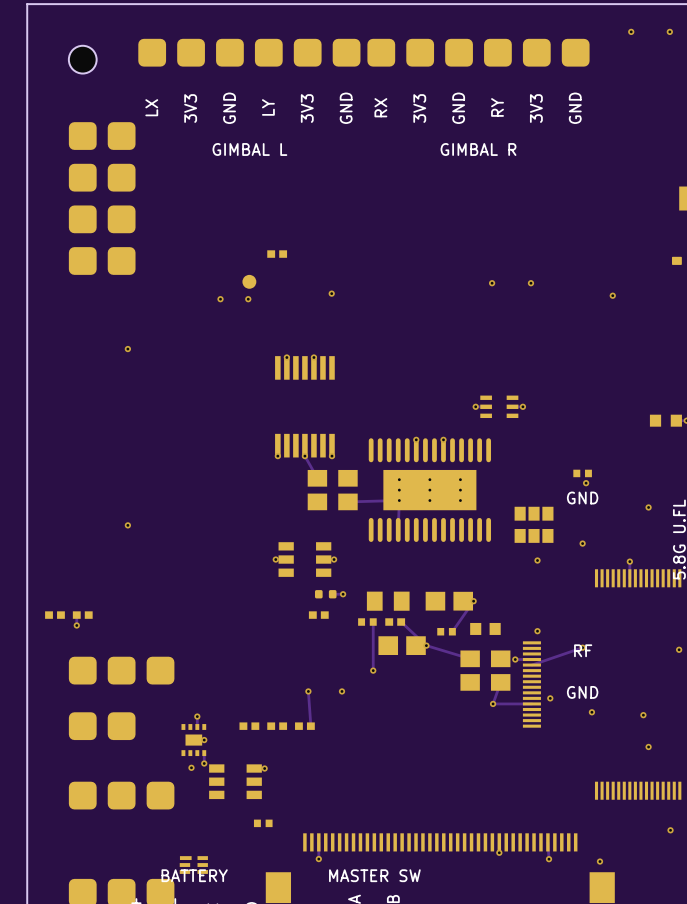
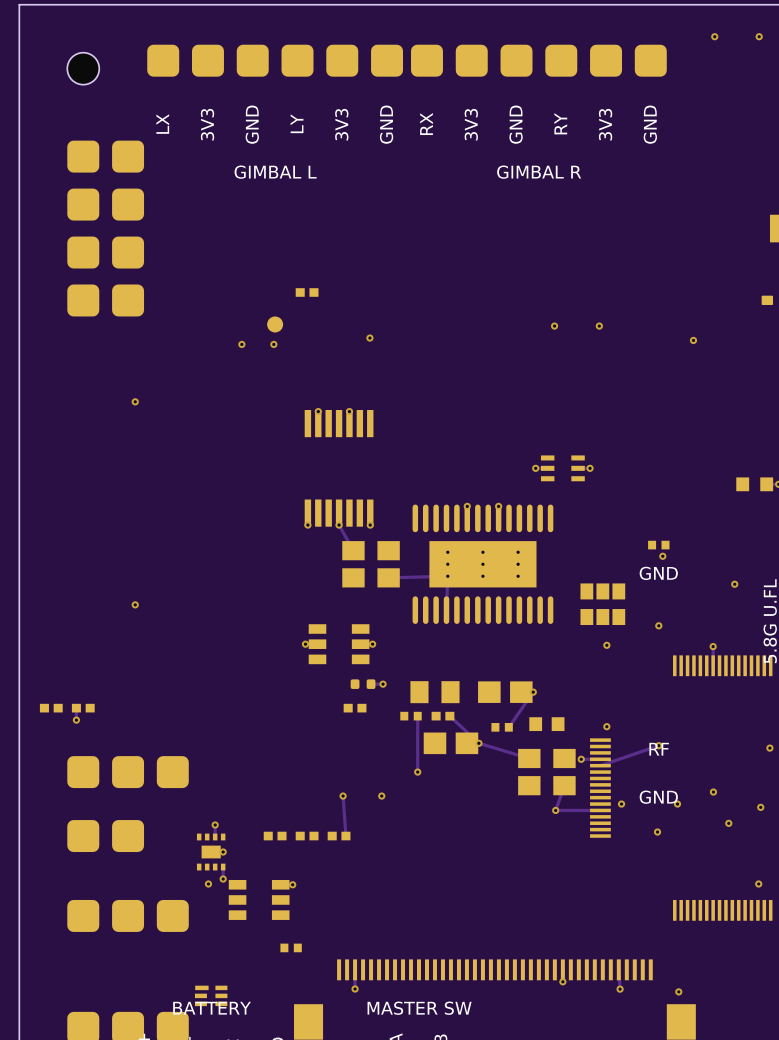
via: none -> (713, 792)
via: none -> (677, 804)
via: none -> (760, 807)
via: (591, 712) -> none
via: none -> (657, 832)
via: (648, 746) -> none
via: none -> (758, 883)
via: (670, 830) -> none

